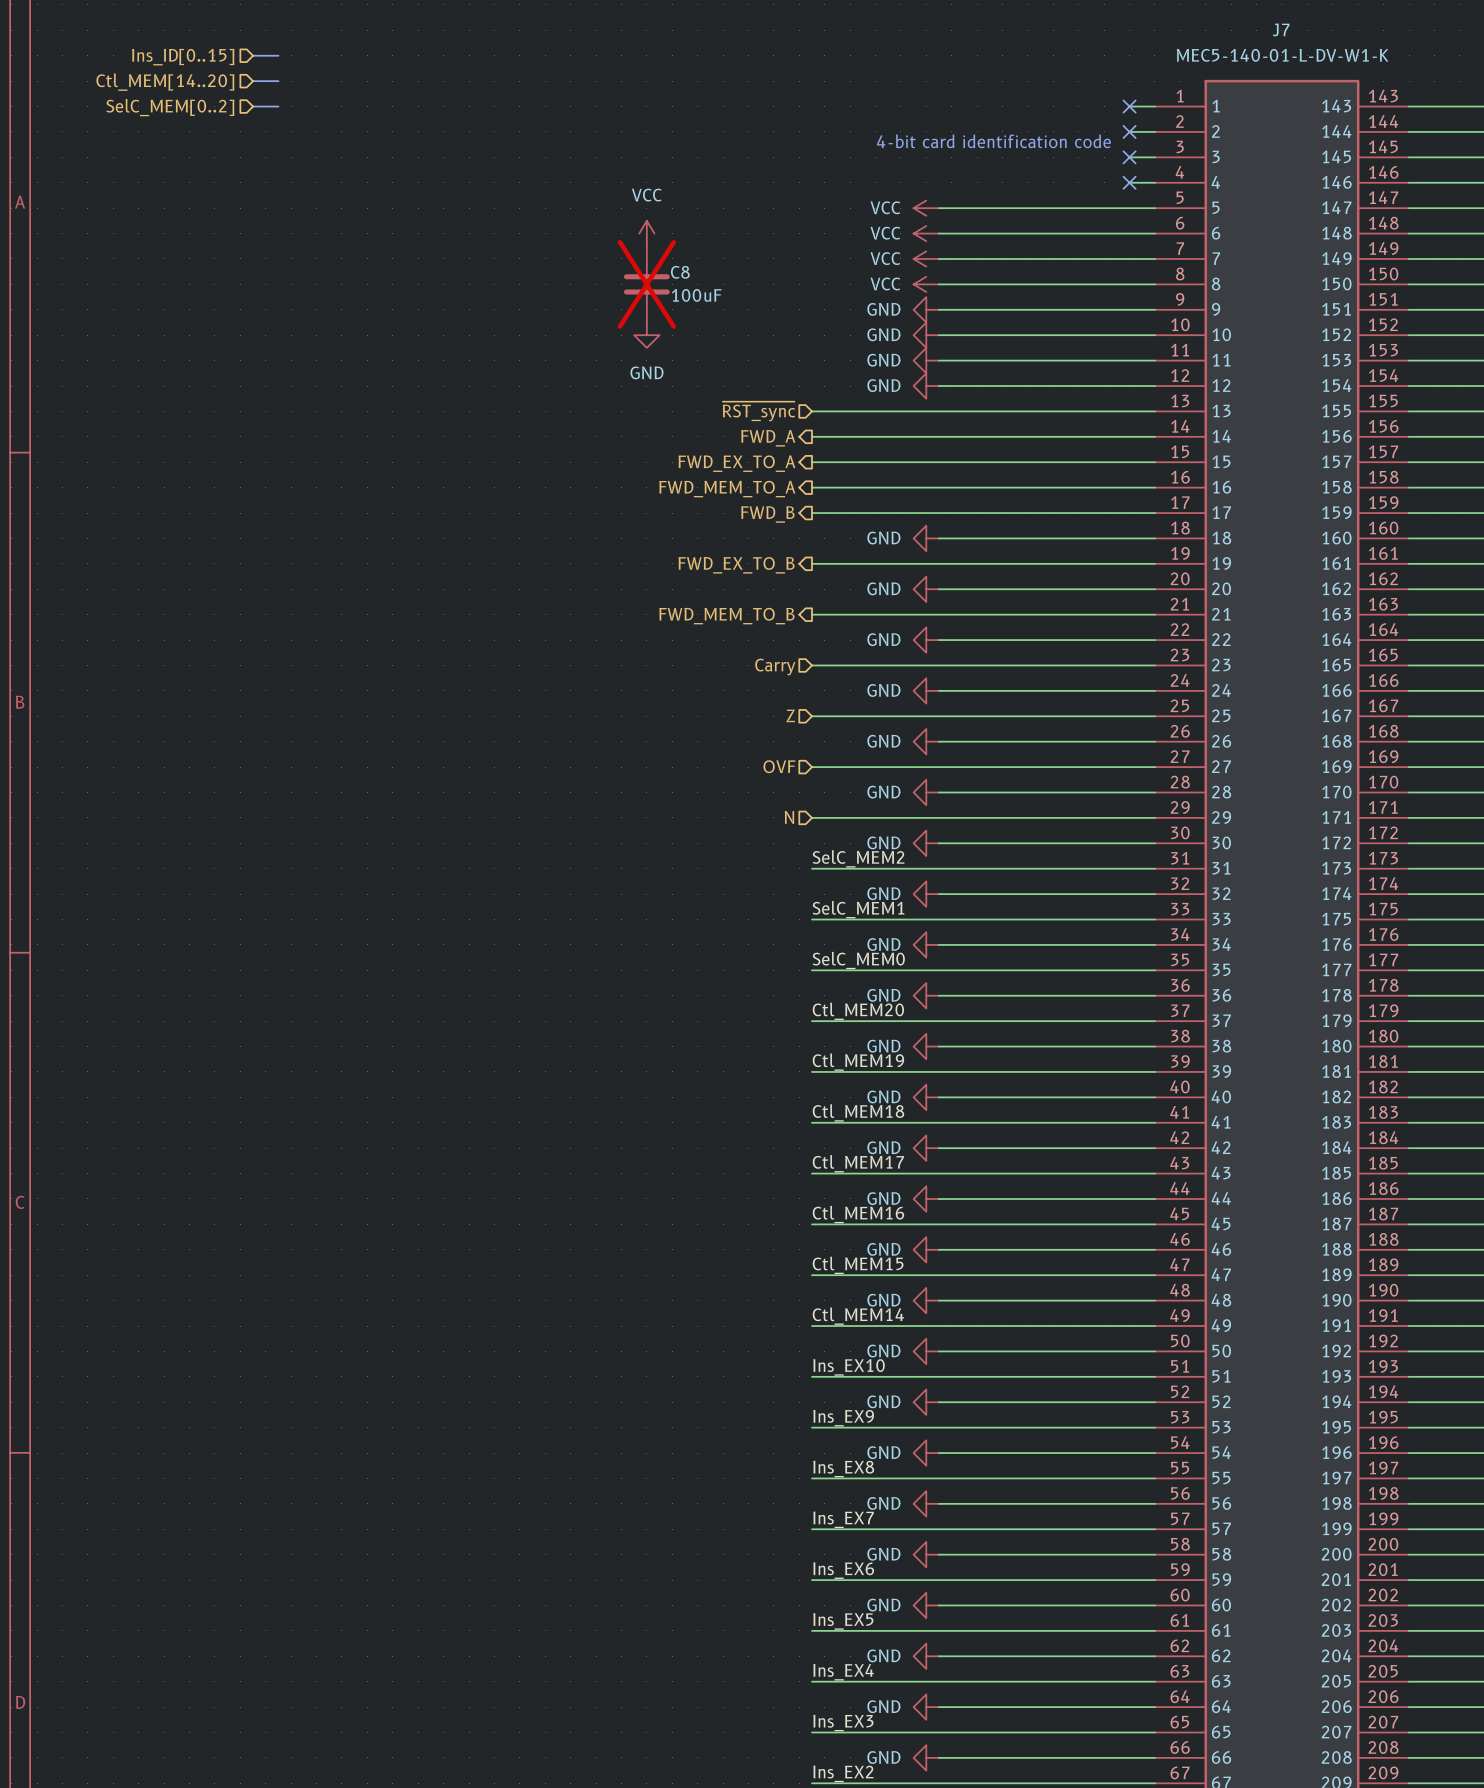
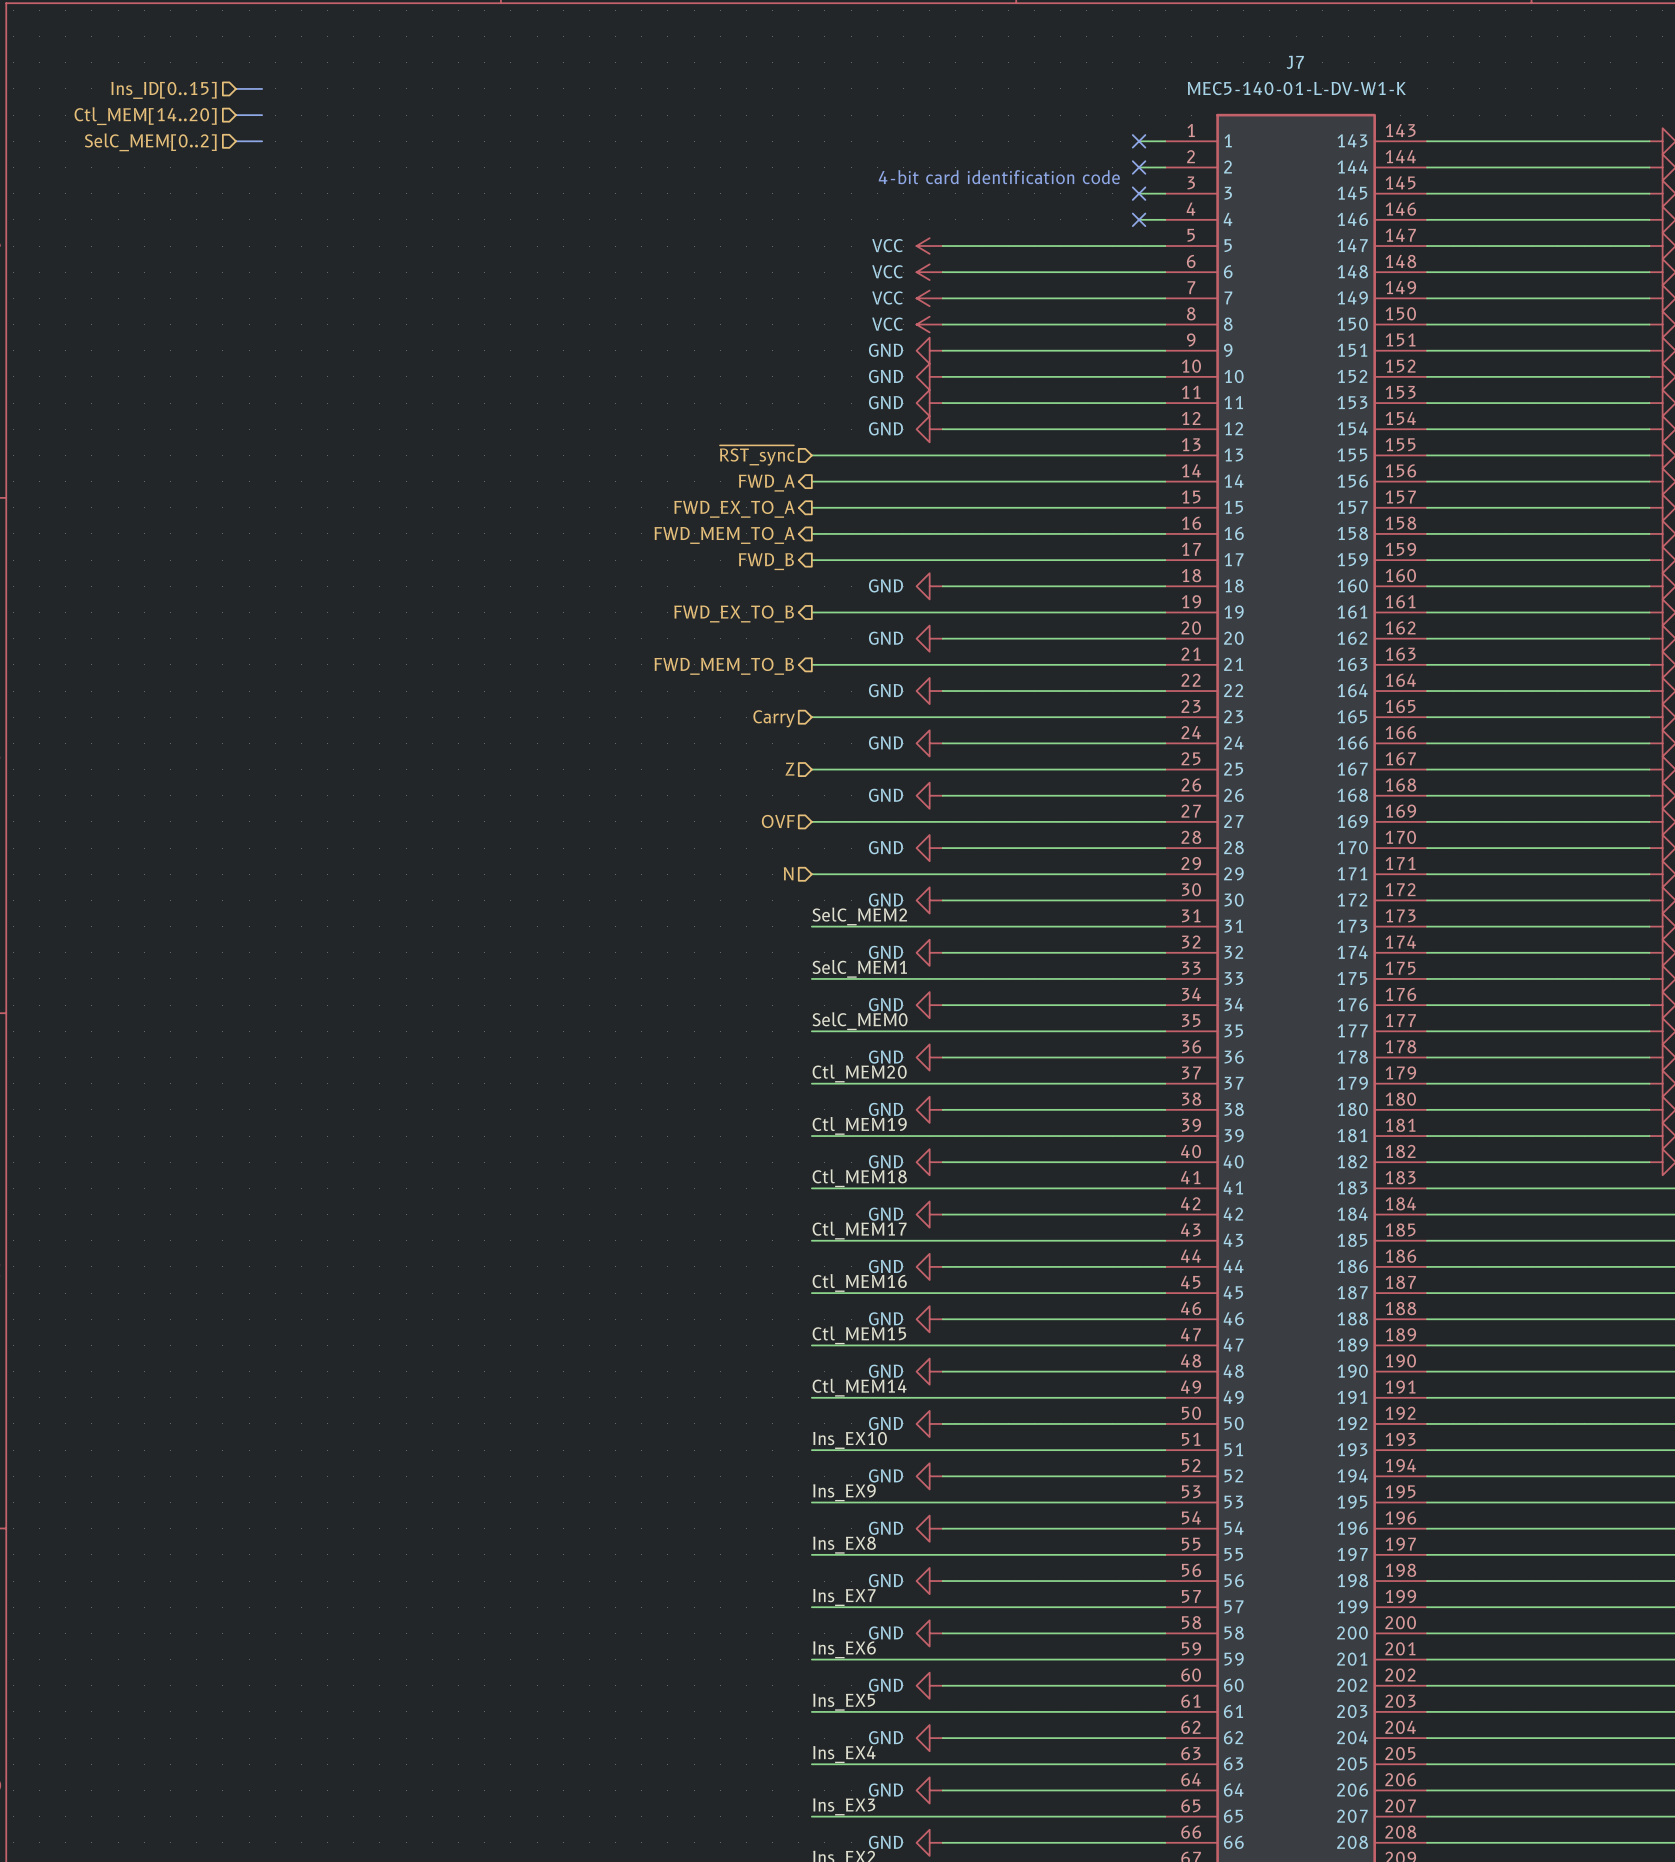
power symbol: VCC (646, 233) -> none
C8: 100uF (646, 284) -> none
power symbol: GND (646, 335) -> none

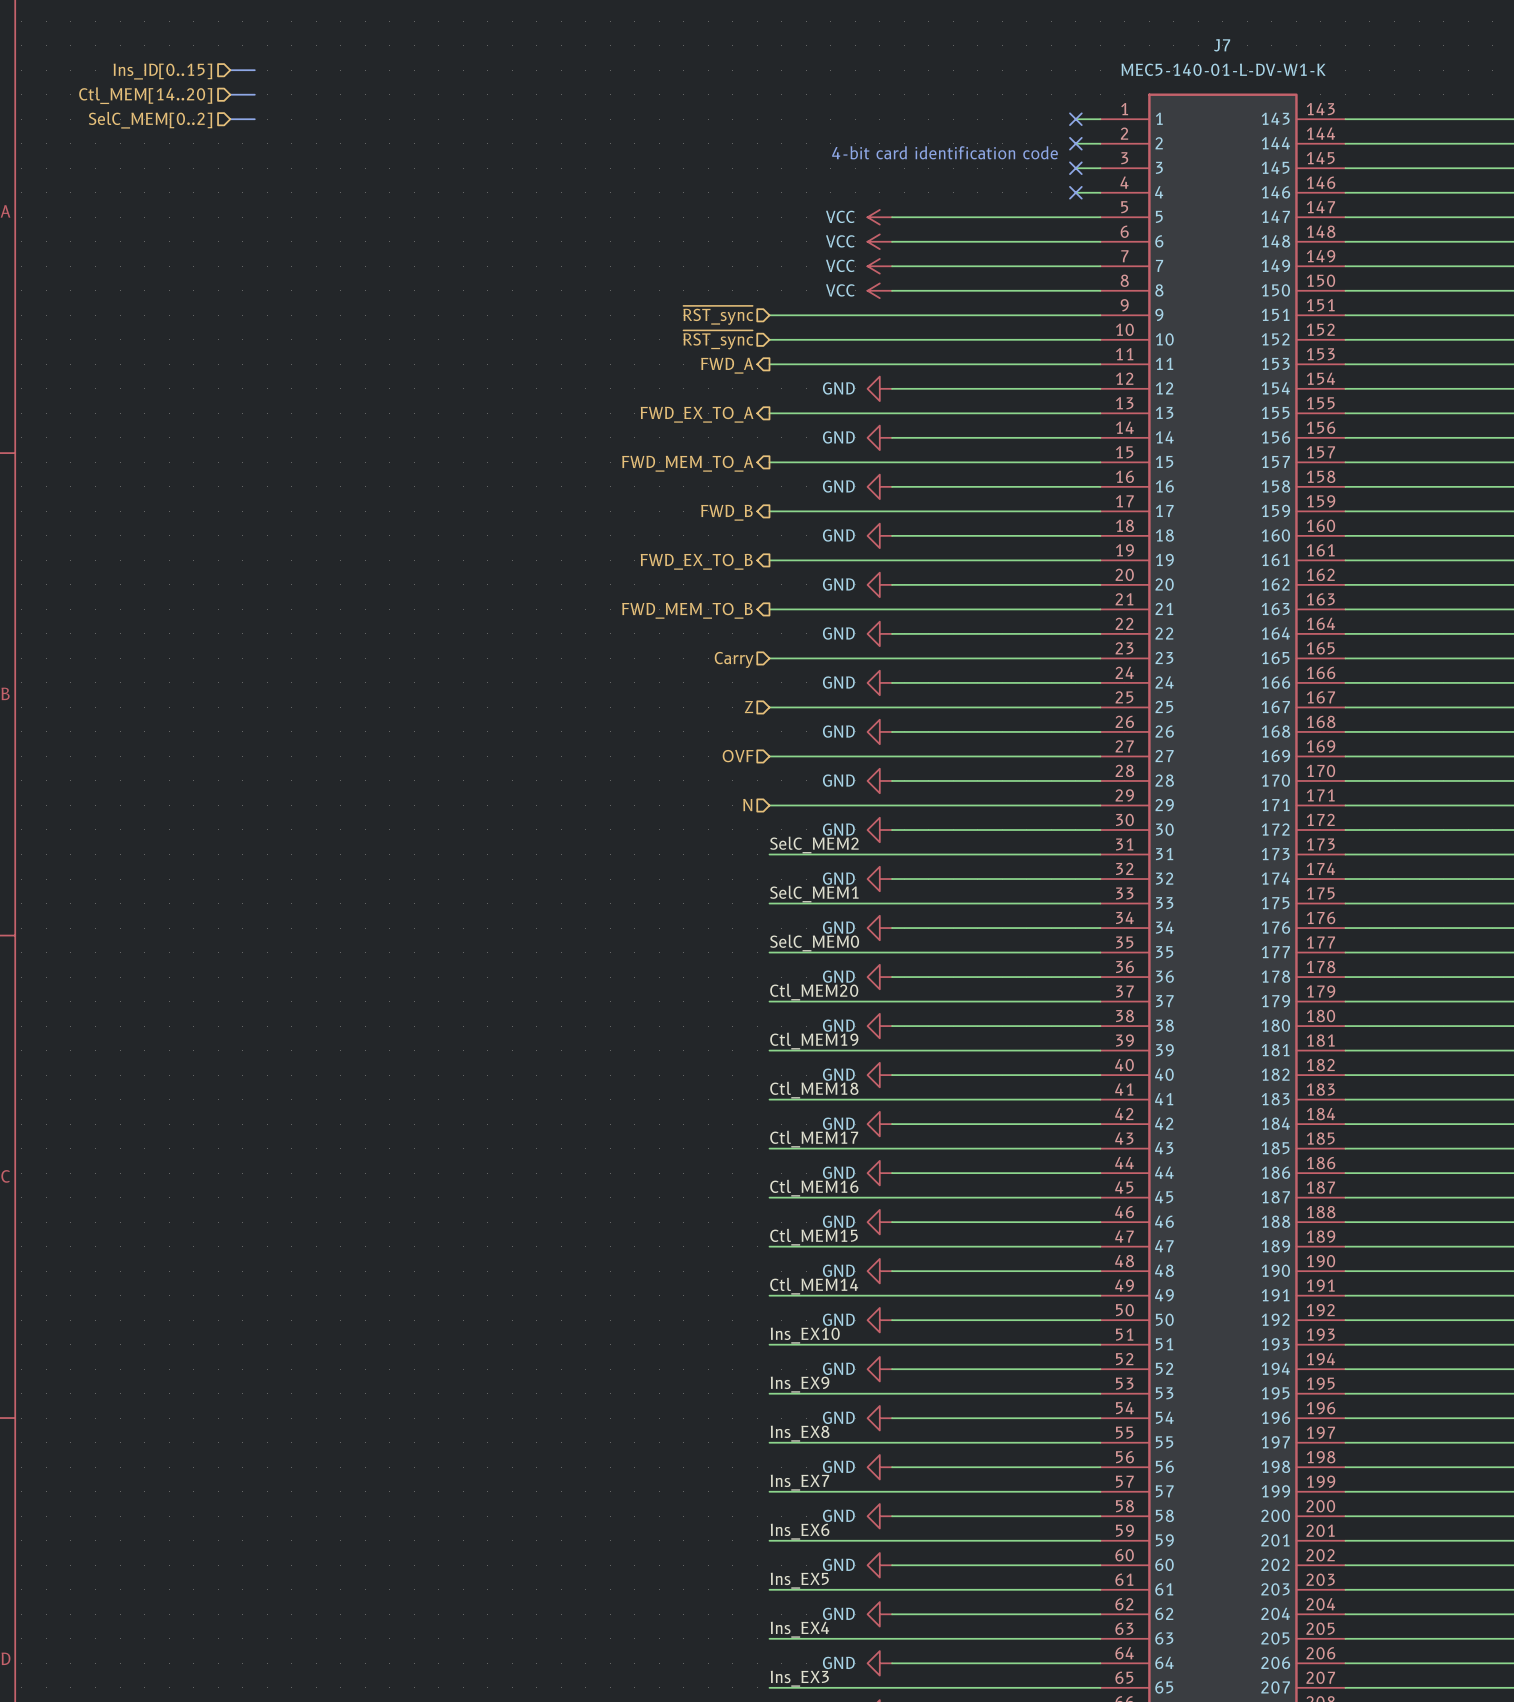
hierarchical label: none -> ~{RST_sync} (718, 315)
power symbol: GND (929, 350) -> none
hierarchical label: none -> ~{RST_sync} (718, 339)
wire: none -> (769, 339) (892, 339)
power symbol: GND (929, 376) -> none
power symbol: GND (929, 403) -> none
hierarchical label shape: input (757, 455) -> output (697, 414)
hierarchical label: ~{RST_sync} (757, 455) -> FWD_EX_TO_A (697, 414)
wire: (811, 481) (942, 481) -> (769, 315) (892, 315)
power symbol: none -> GND (879, 437)
hierarchical label position: FWD_A (766, 483) -> FWD_A (727, 365)
hierarchical label: FWD_EX_TO_A (734, 509) -> FWD_MEM_TO_A (687, 463)
wire: (811, 533) (942, 533) -> (769, 364) (892, 364)
power symbol: none -> GND (879, 486)
hierarchical label: FWD_MEM_TO_A (724, 535) -> none

